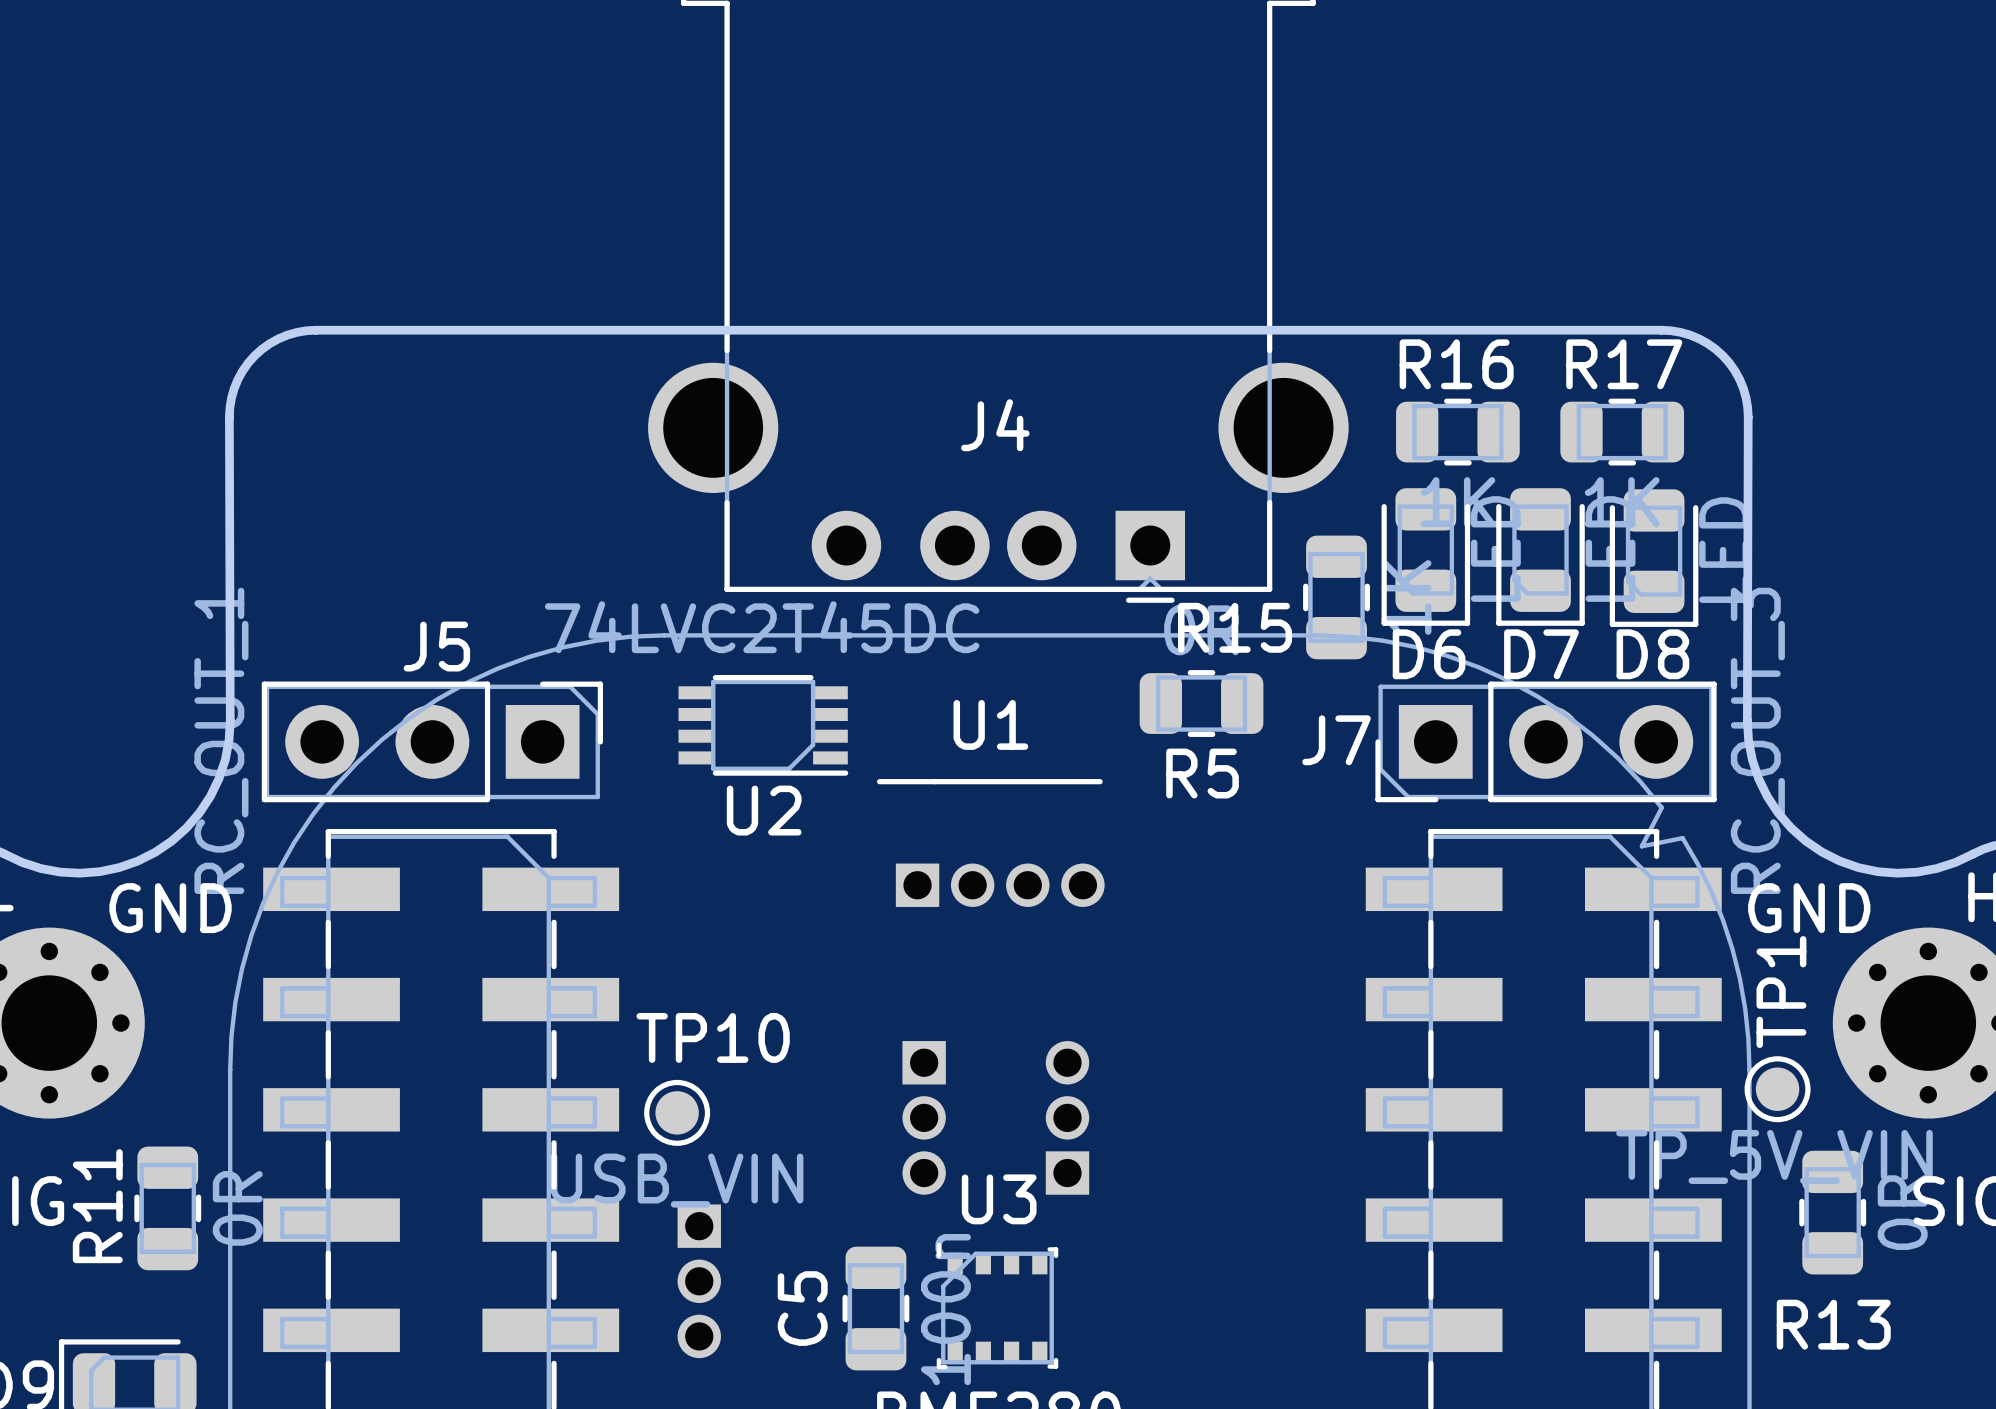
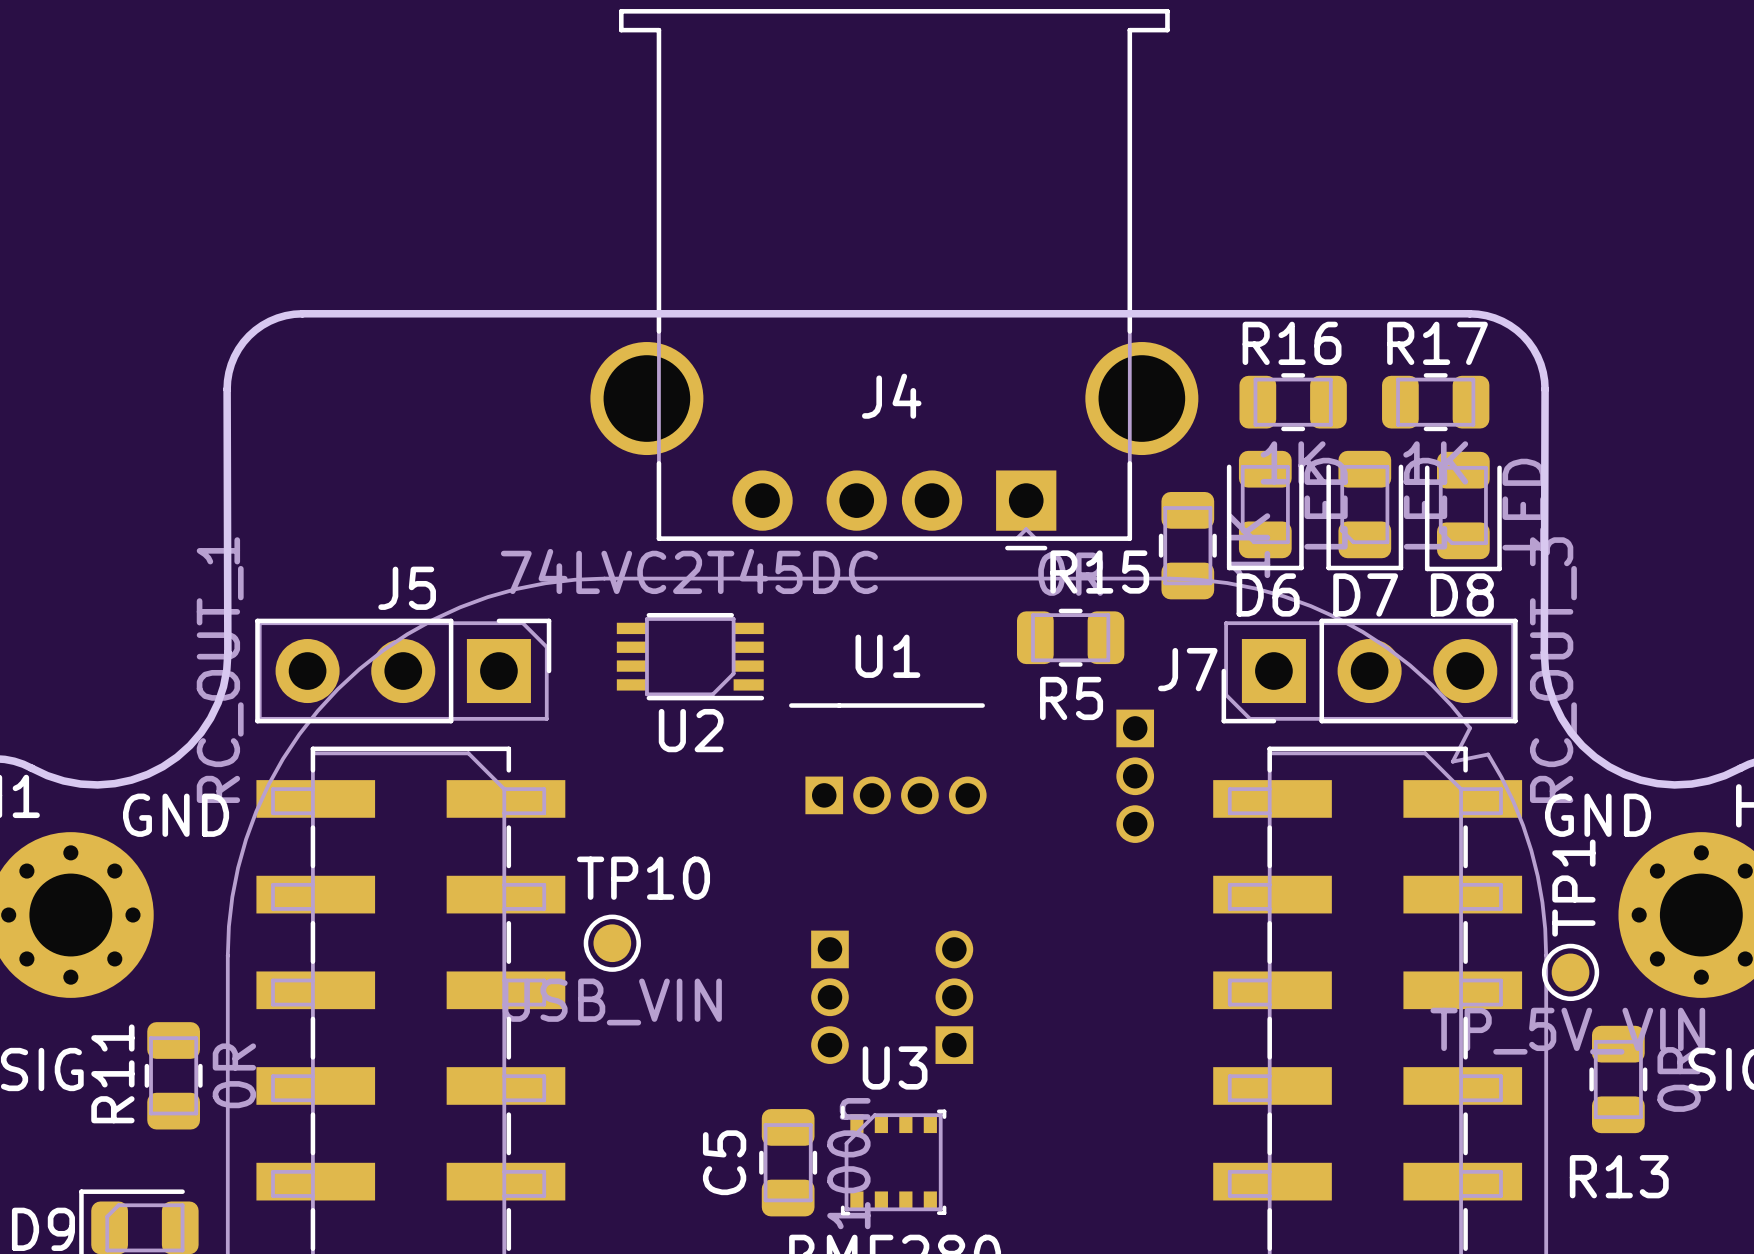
TP10 position: (677, 1112) -> (612, 943)
part position: (699, 1281) -> (1135, 776)

